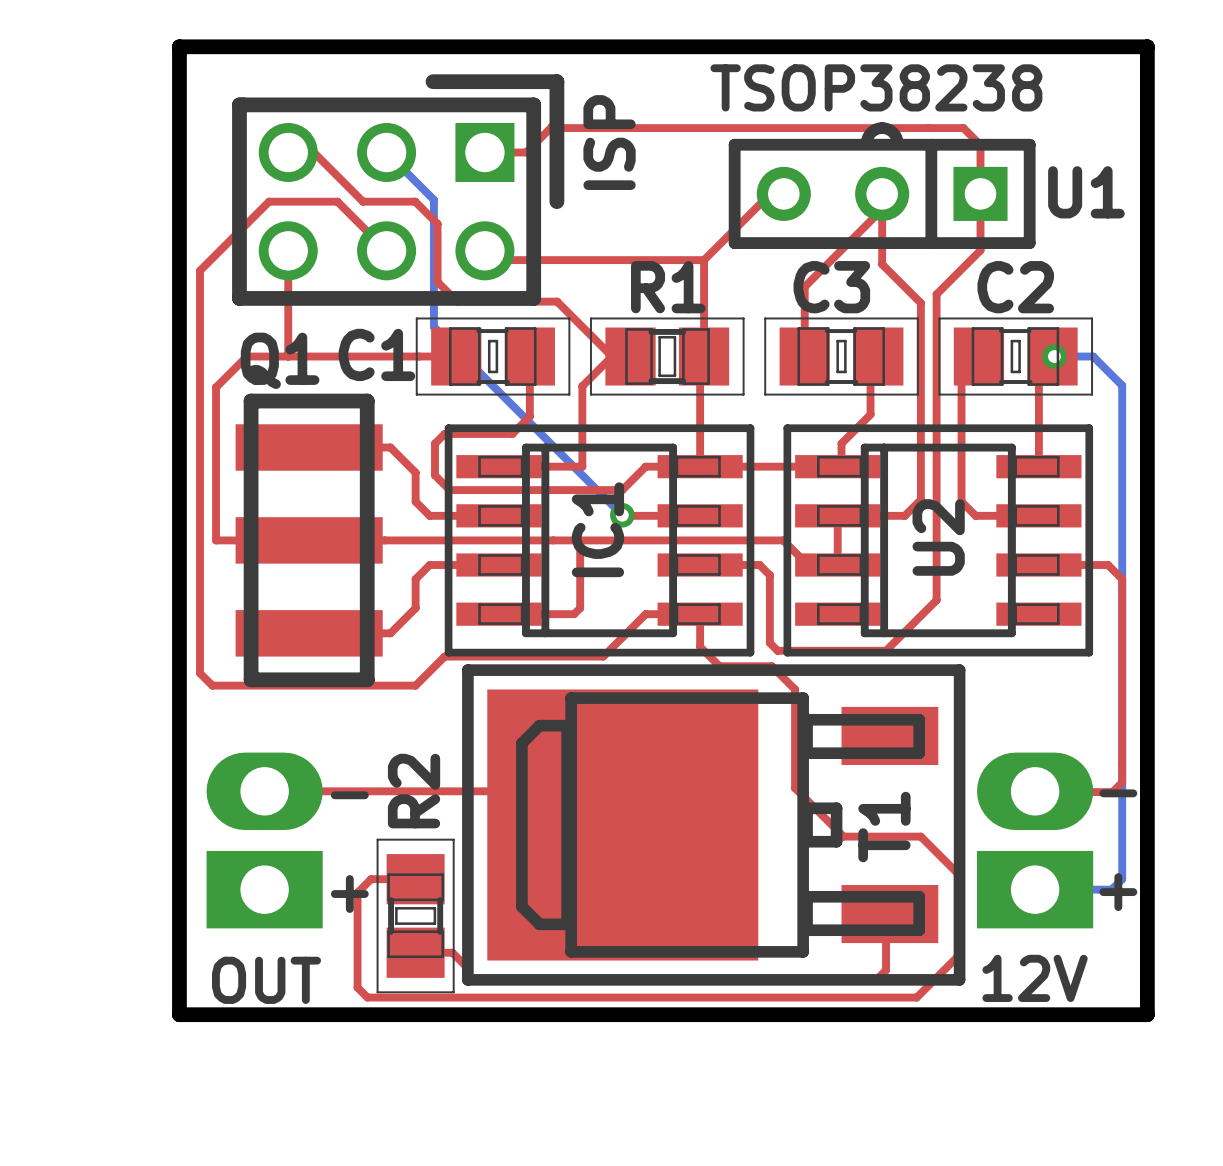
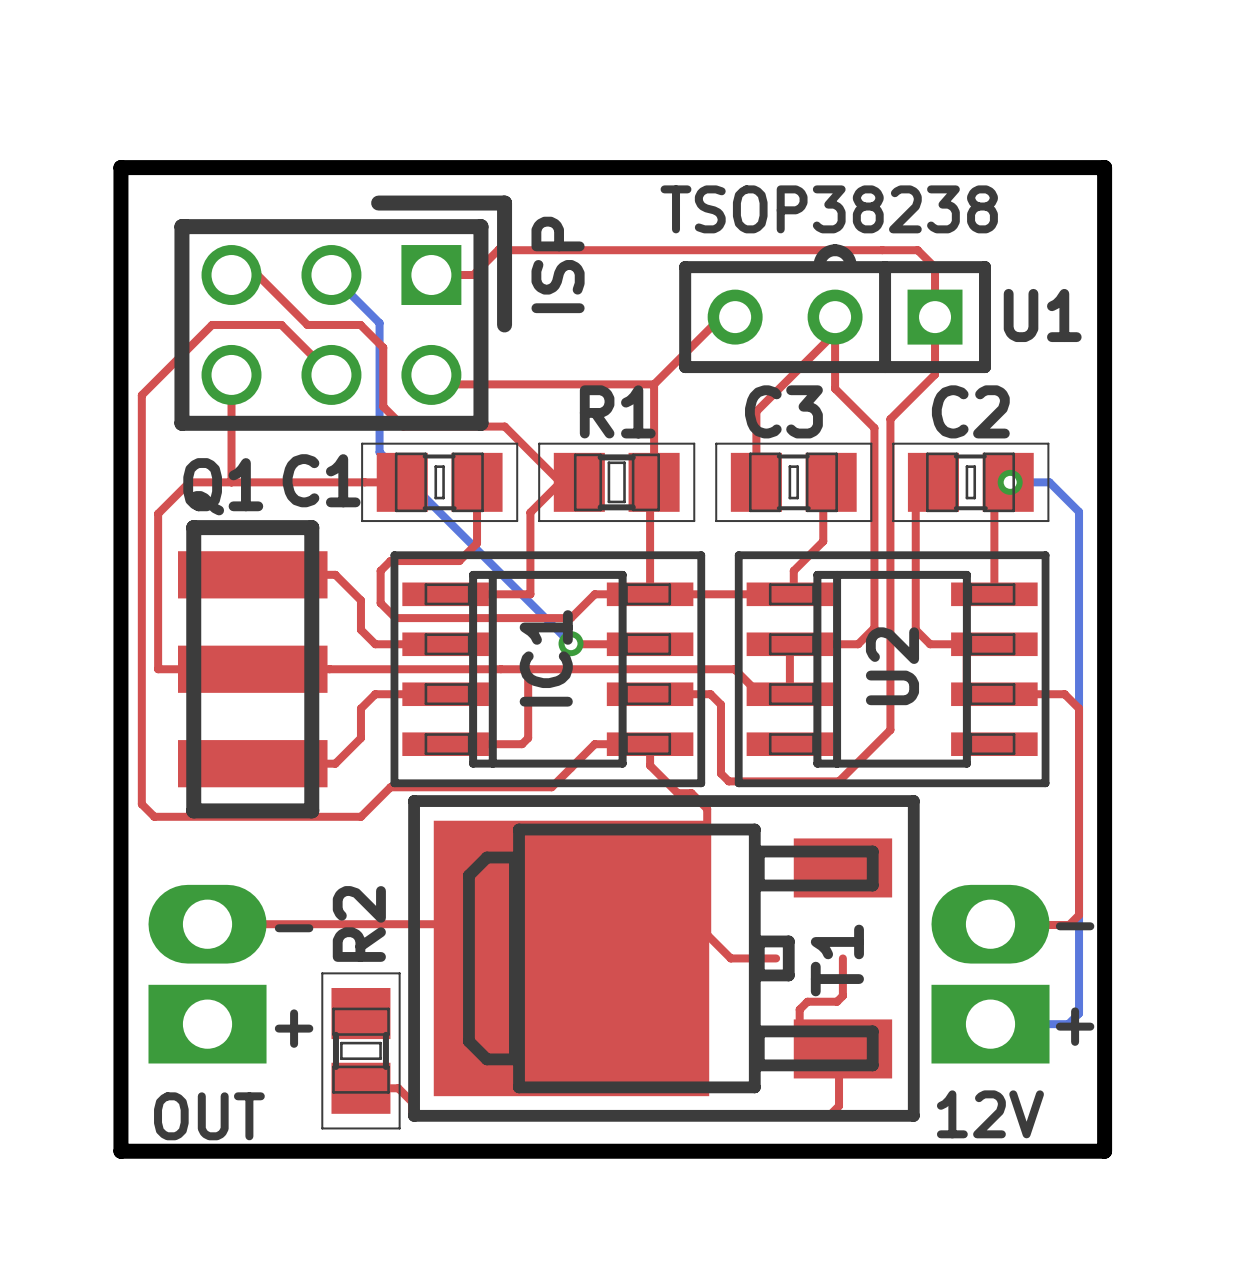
top track: (700, 635) (700, 646) (719, 666) (771, 666) (795, 689) (795, 788) (843, 836) (920, 836) (957, 873) (957, 956) (916, 997) (367, 997) (357, 987) (357, 892) (371, 879) (415, 879) -> (650, 765) (677, 793) (691, 793) (707, 808) (707, 934) (730, 958) (776, 958)
top track: none -> (842, 958) (842, 995) (837, 1001) (807, 1001) (799, 1009) (799, 1048)

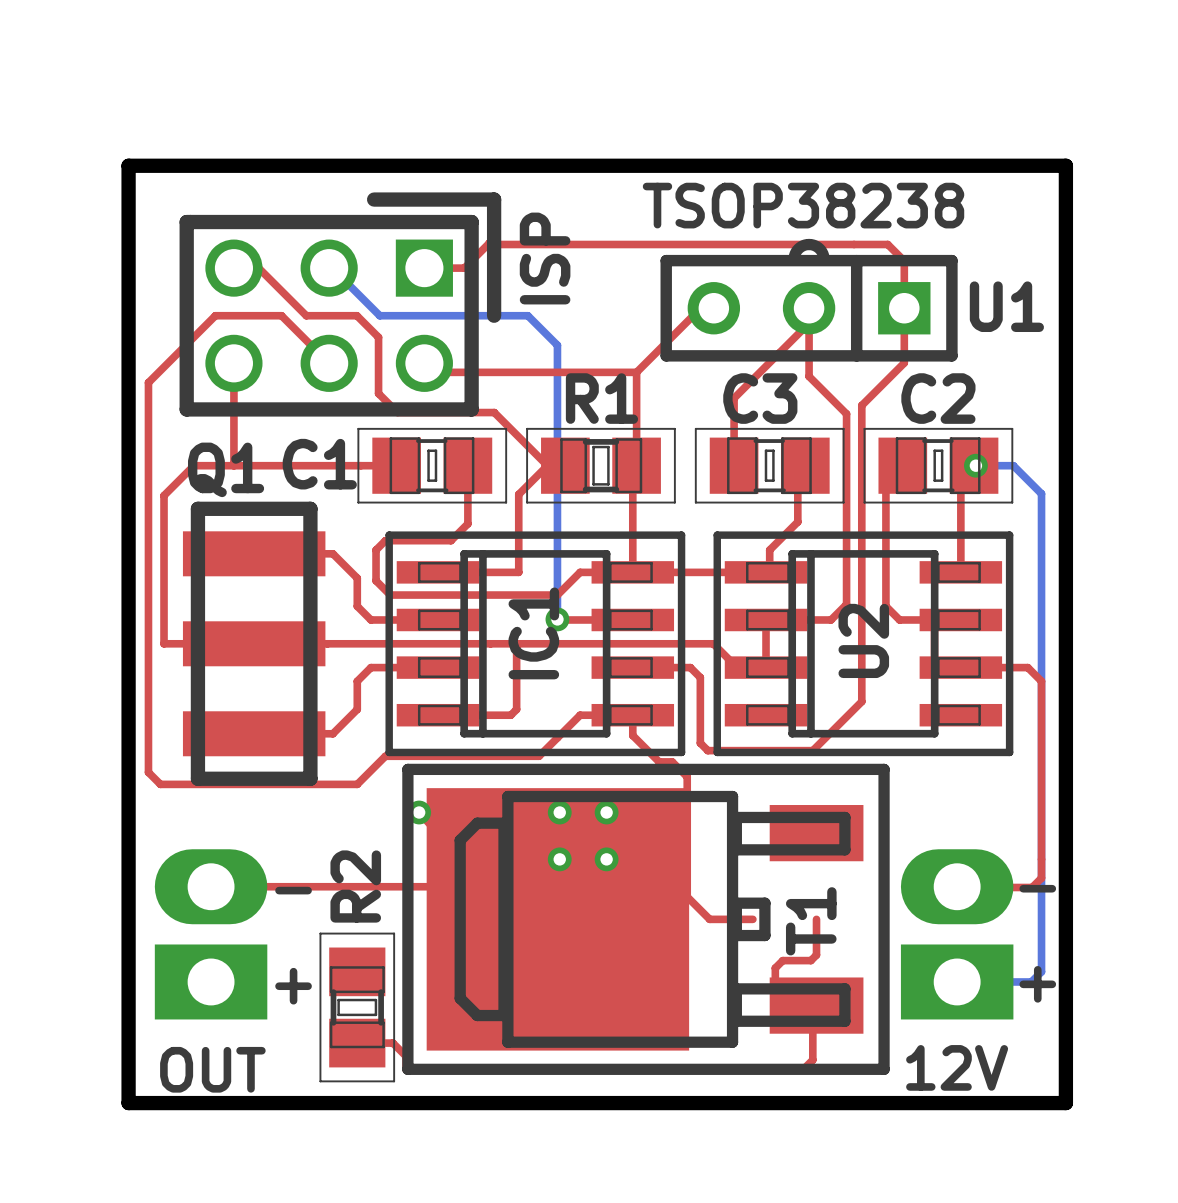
bottom track: (331, 275) (379, 323) (379, 452) (571, 643) -> (329, 268) (332, 268) (379, 315) (527, 315) (557, 345) (557, 619)
via: none -> (419, 812)
via: none -> (559, 812)
via: none -> (606, 812)
via: none -> (559, 859)
via: none -> (606, 859)

